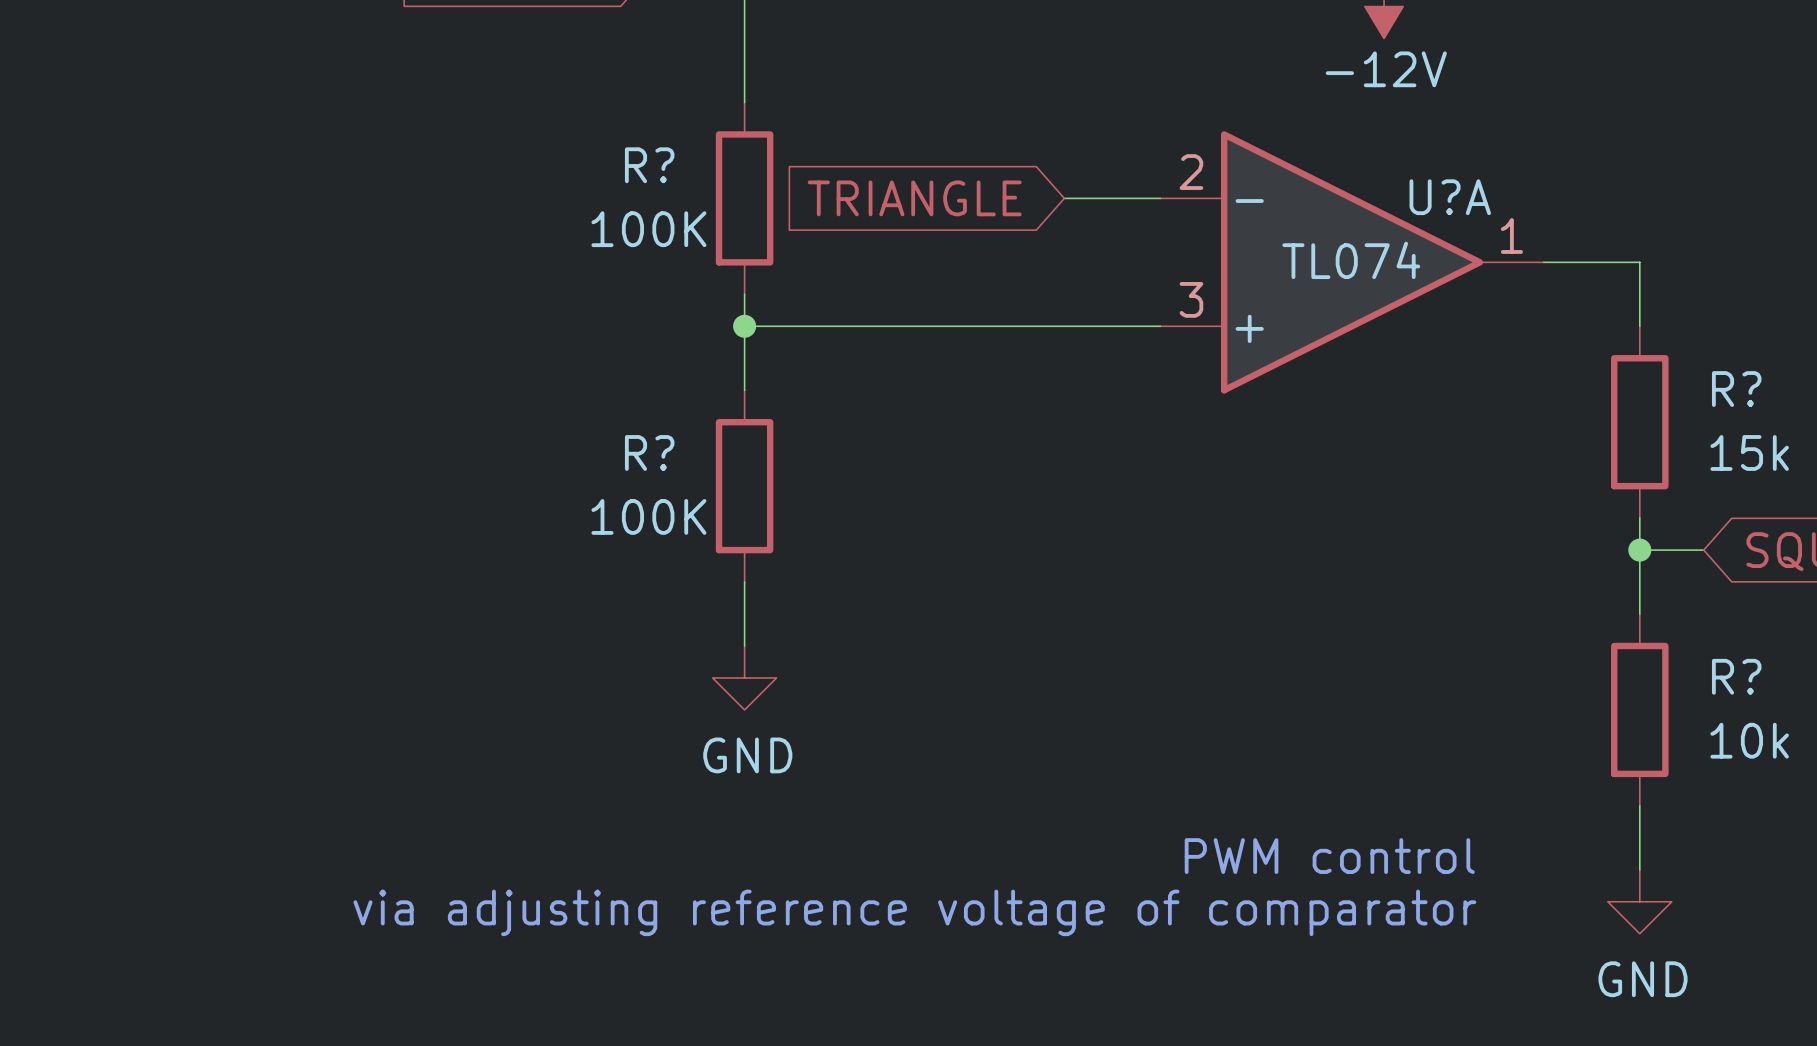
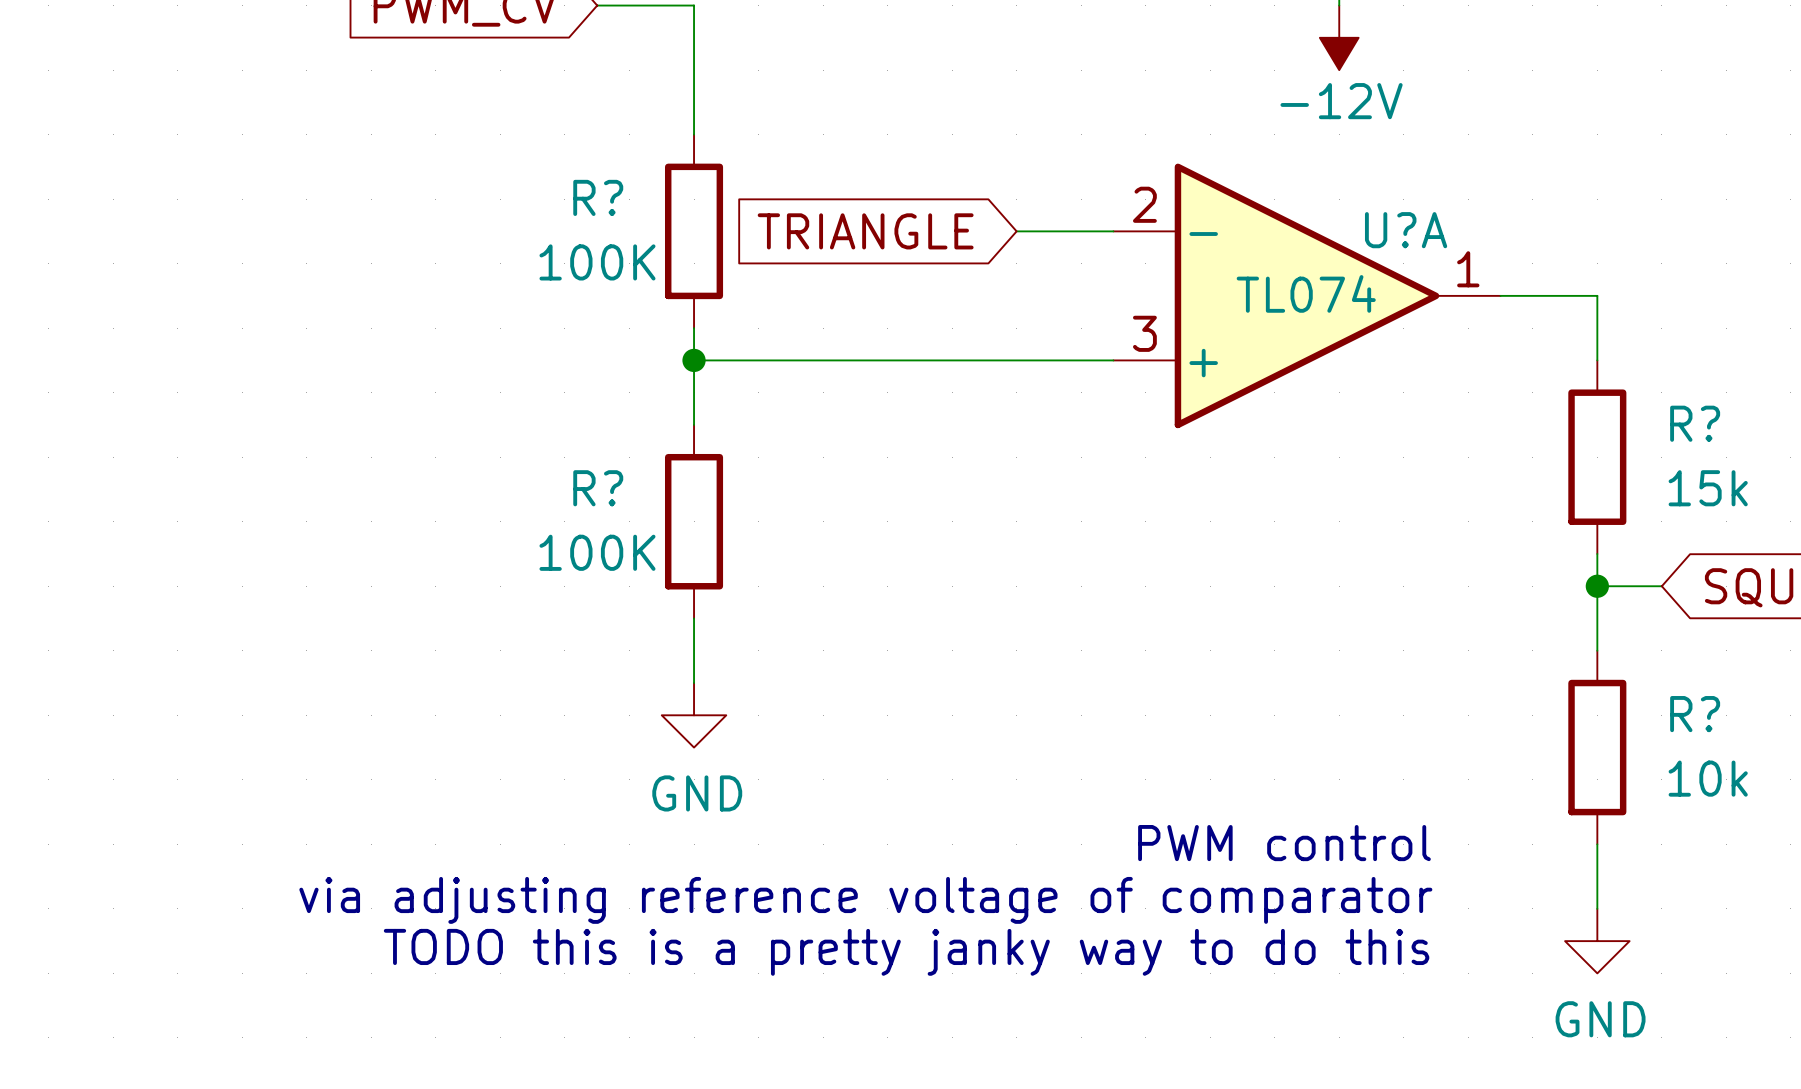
text: none -> PWM control (1284, 843)
text: PWM control (1329, 856) -> via adjusting reference voltage of comparator (865, 900)
text: via adjusting reference voltage of comparator (914, 912) -> TODO this is a pretty janky way to do this (906, 952)

